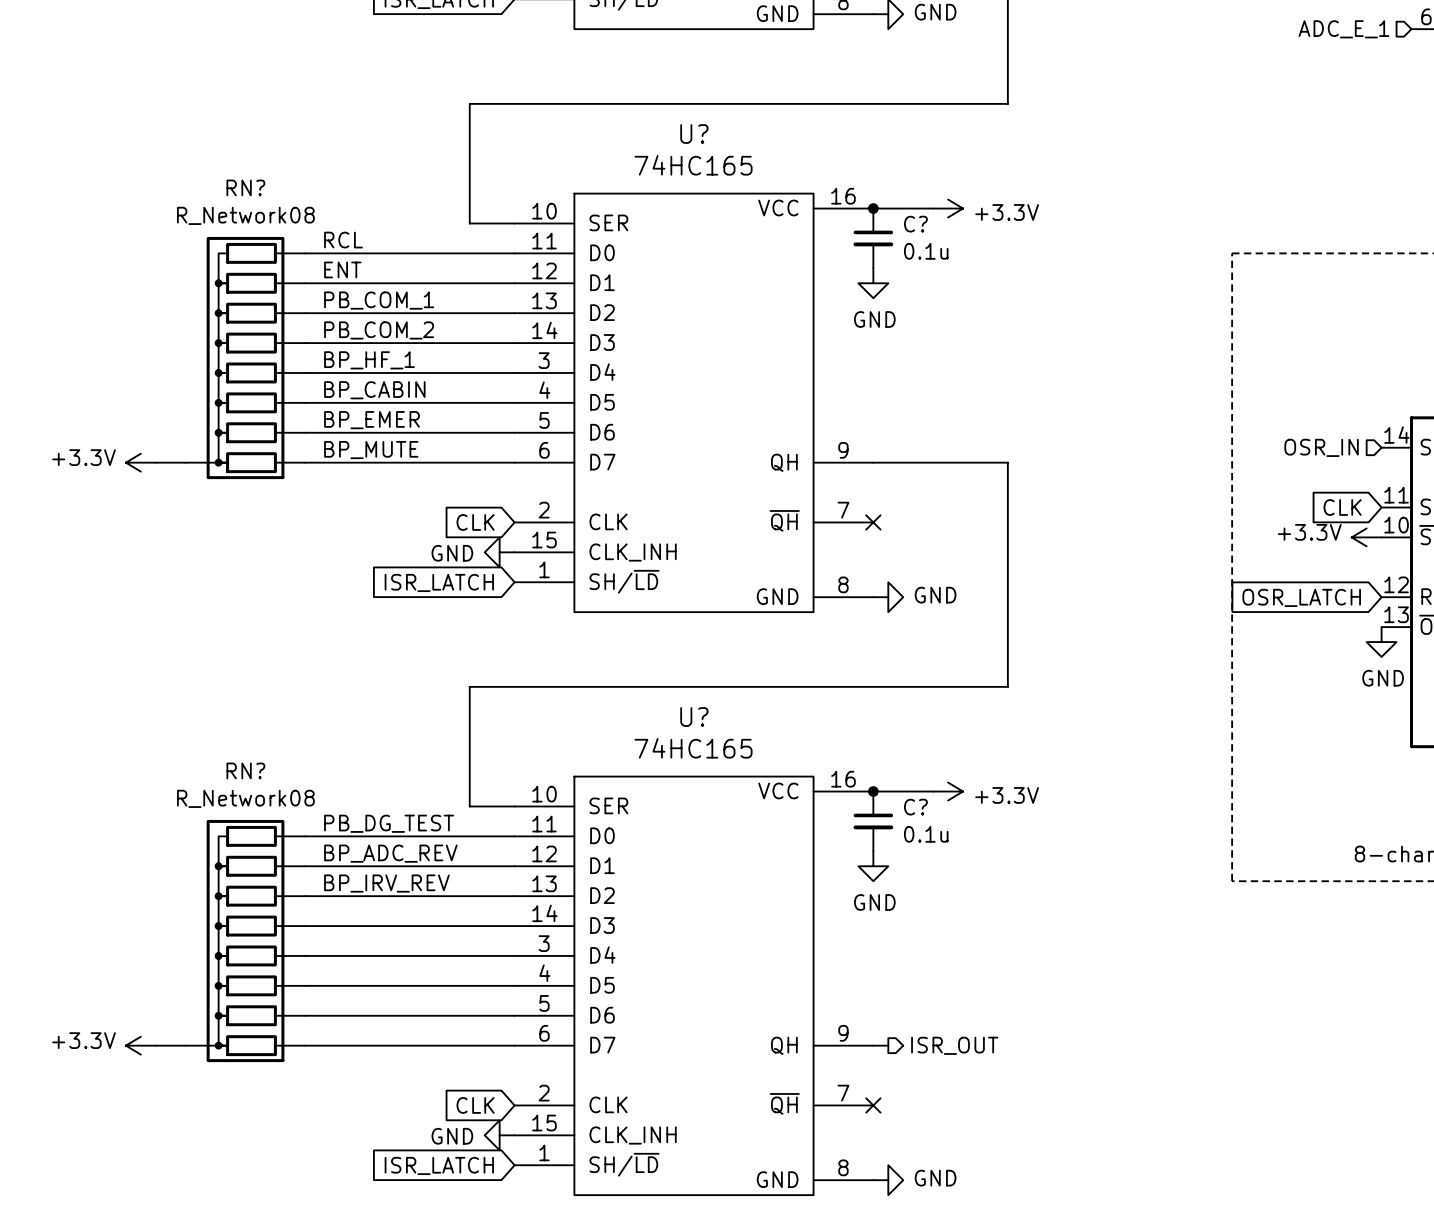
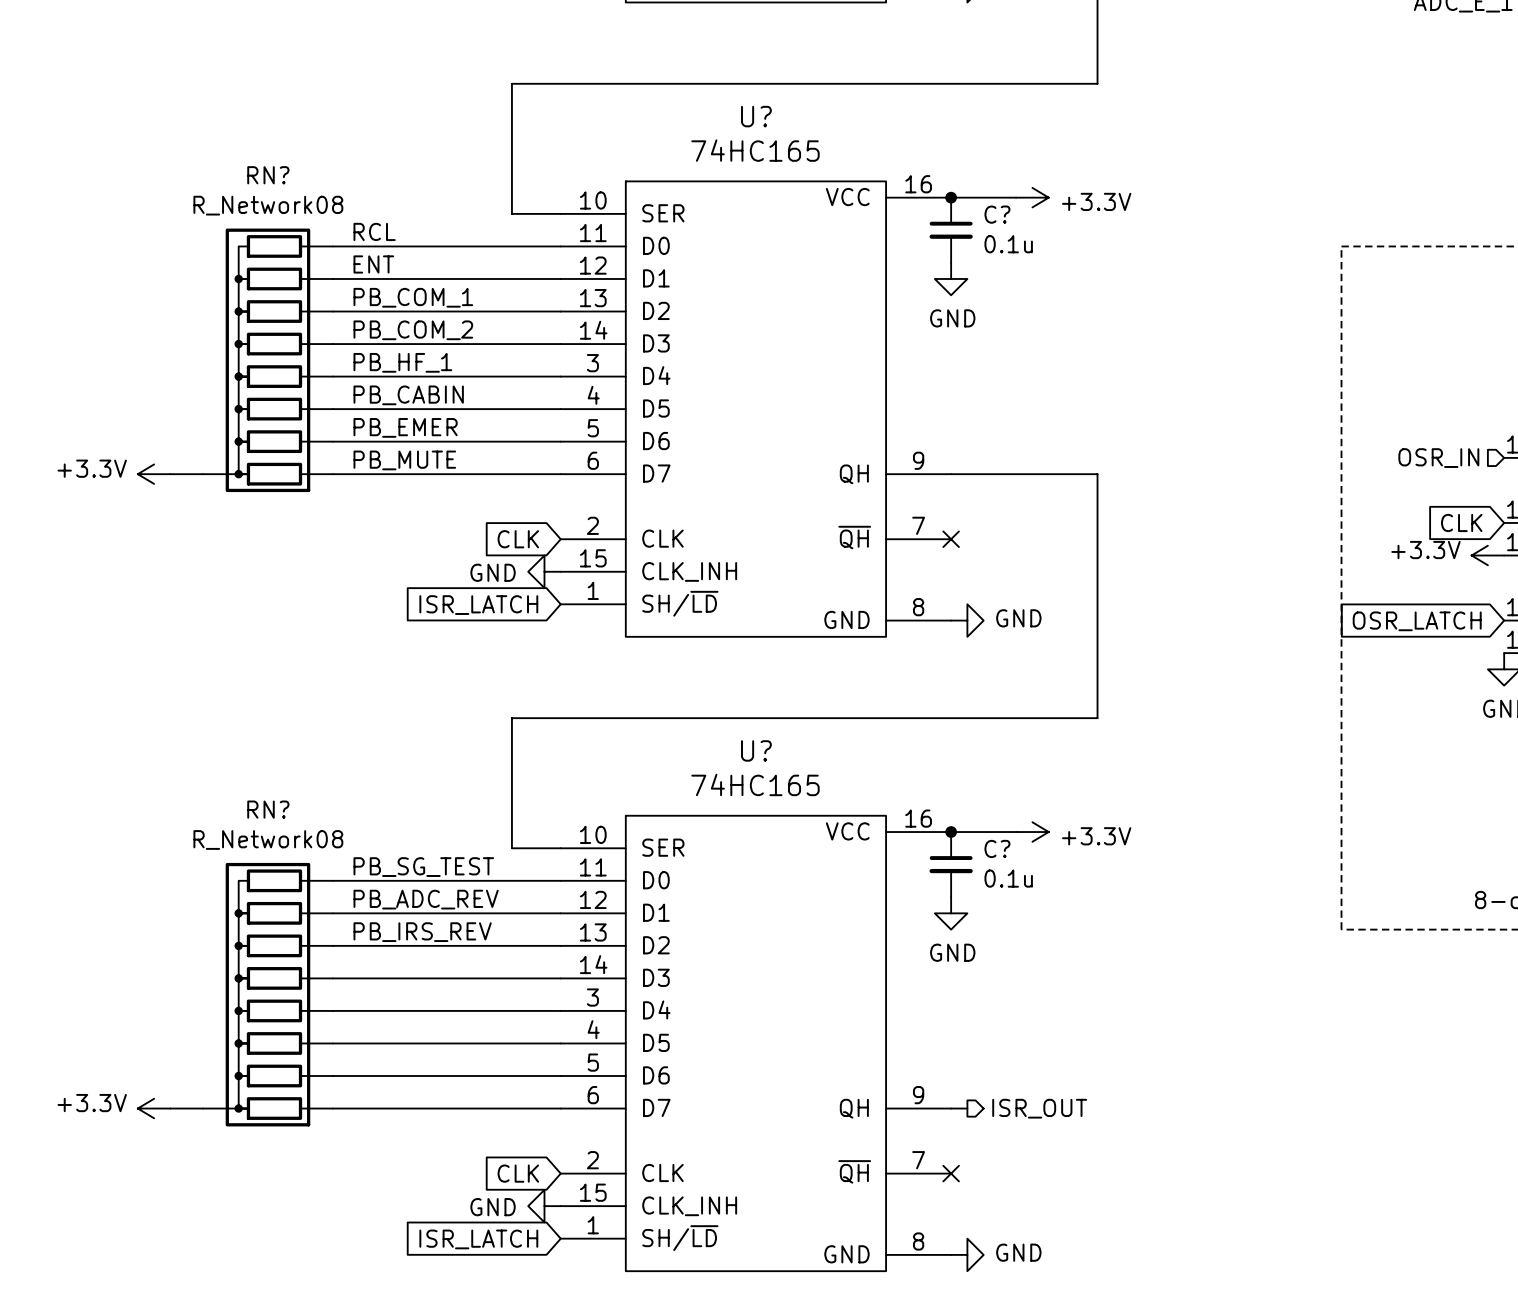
label: BP_HF_1 (369, 360) -> PB_HF_1 (402, 362)
label: BP_CABIN (374, 390) -> PB_CABIN (408, 395)
label: BP_EMER (371, 420) -> PB_EMER (405, 427)
label: BP_MUTE (371, 450) -> PB_MUTE (404, 460)
label: PB_DG_TEST (389, 823) -> PB_SG_TEST (423, 867)
label: BP_ADC_REV (390, 853) -> PB_ADC_REV (426, 899)
label: BP_IRV_REV (386, 883) -> PB_IRS_REV (422, 932)

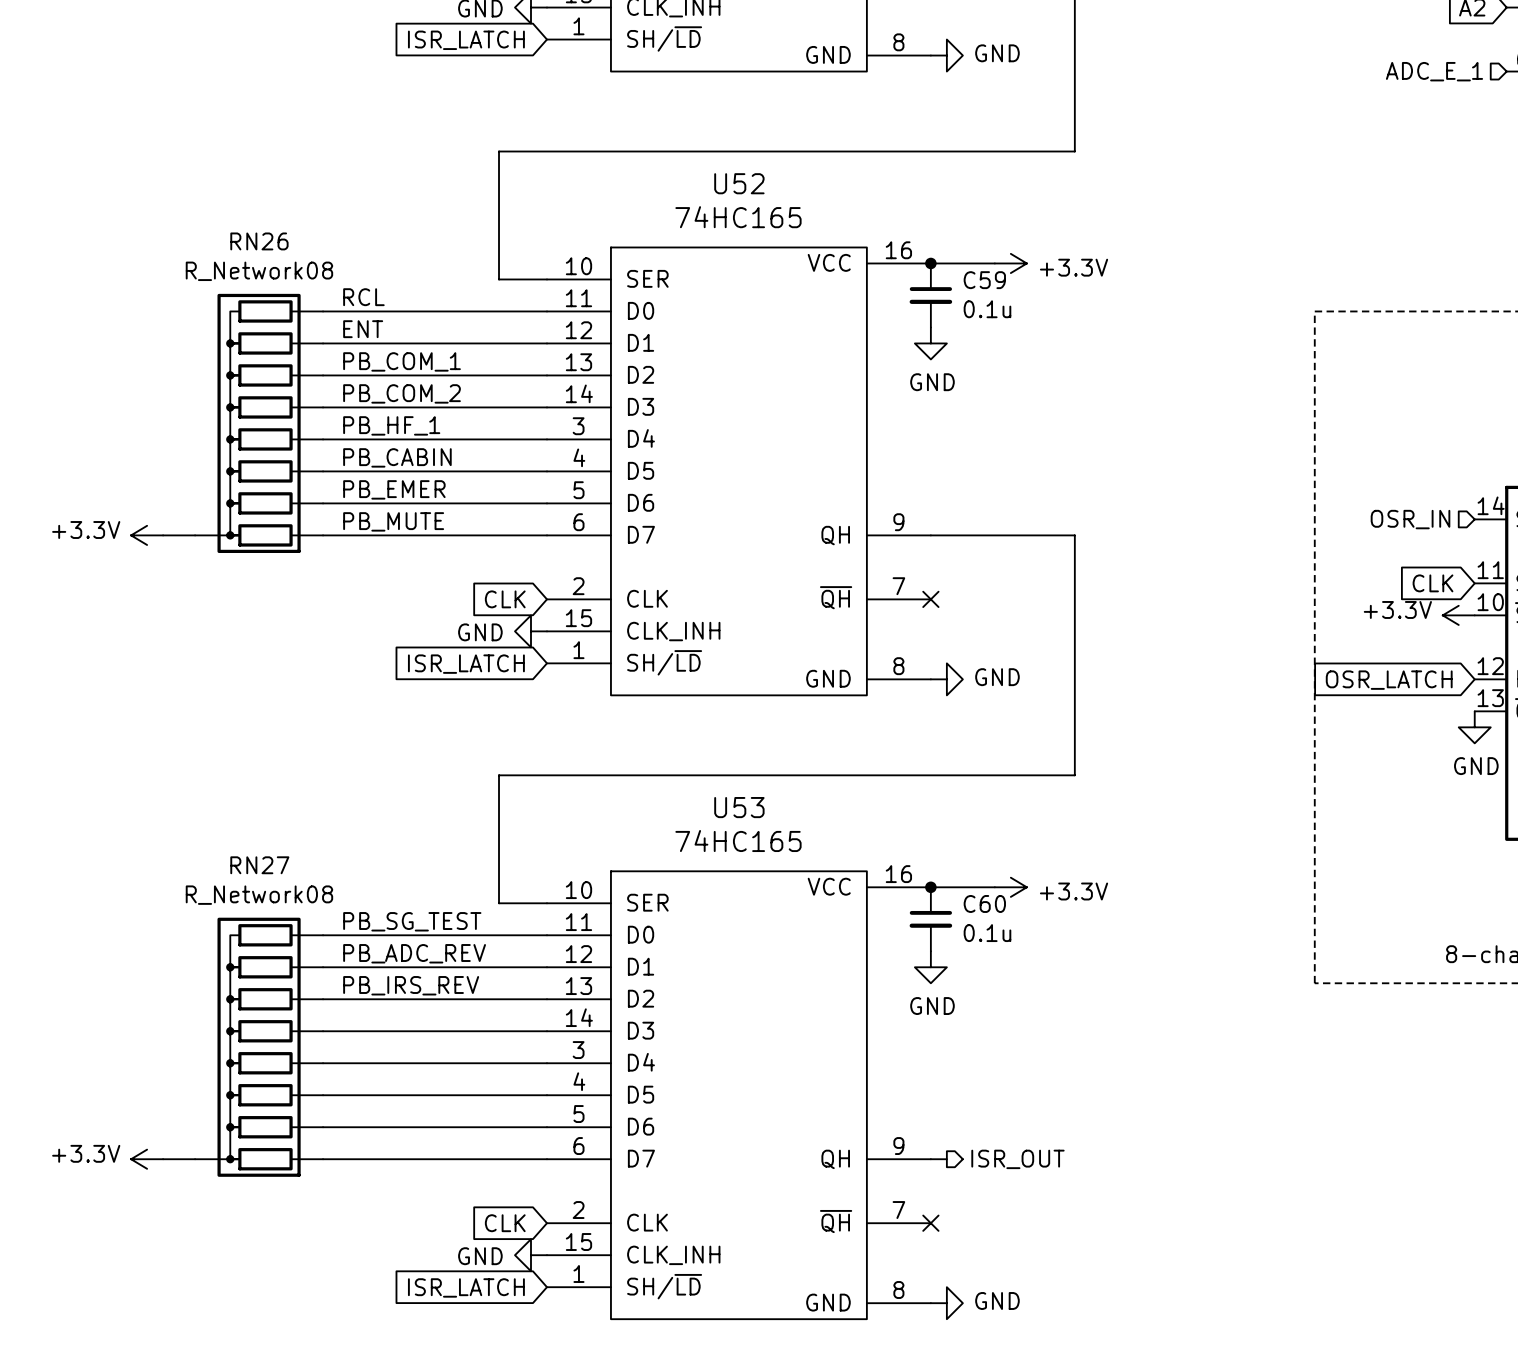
U? name: U? (756, 116) -> U52 (739, 183)
RN? name: RN? (268, 175) -> RN26 (259, 241)
C? name: C? (997, 214) -> C59 (984, 280)
U? name: U? (756, 750) -> U53 (739, 807)
RN? name: RN? (268, 809) -> RN27 (259, 865)
C? name: C? (997, 848) -> C60 (984, 903)

